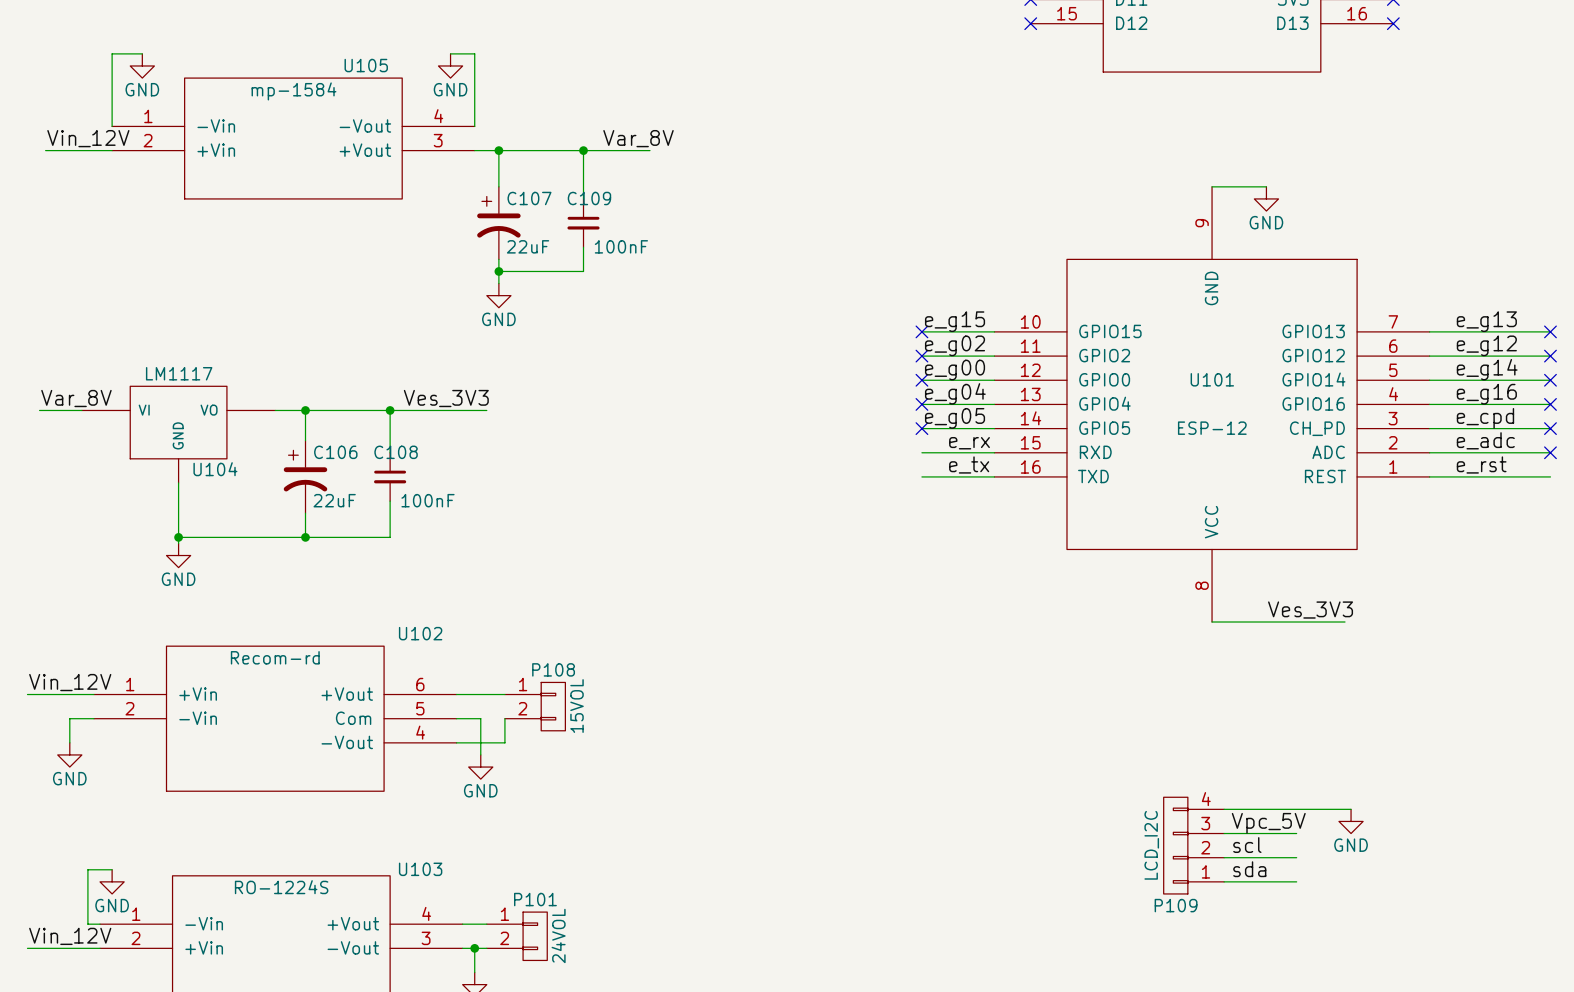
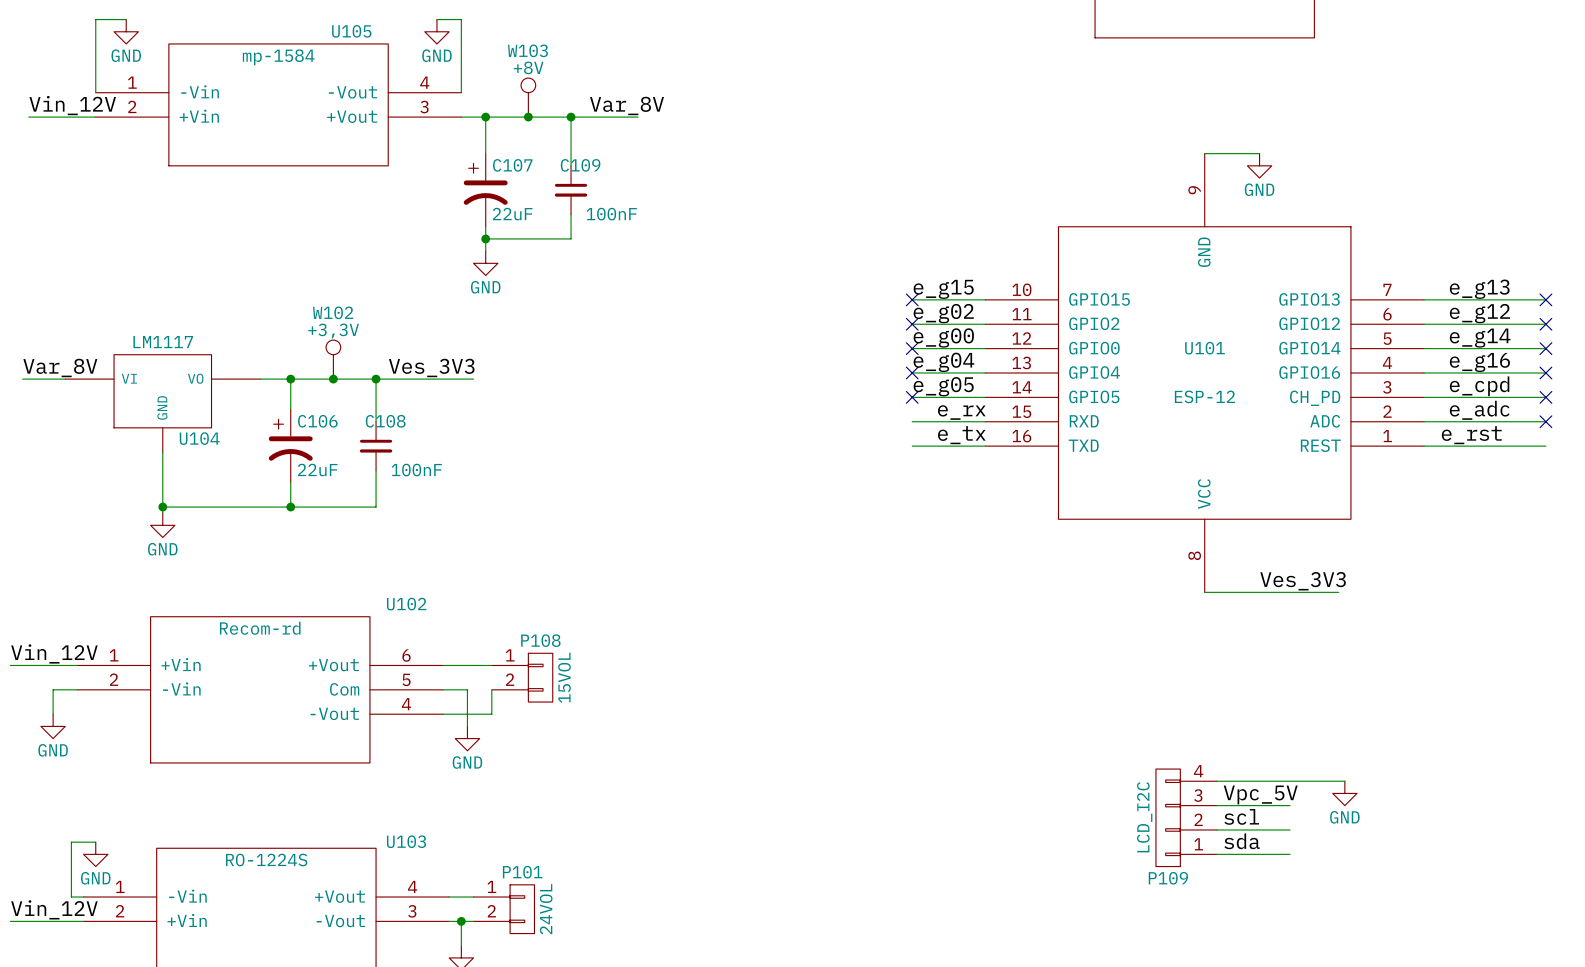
W103: none -> +8V (528, 97)
junction: none -> (528, 117)
W102: none -> +3,3V (333, 359)
junction: none -> (333, 379)

